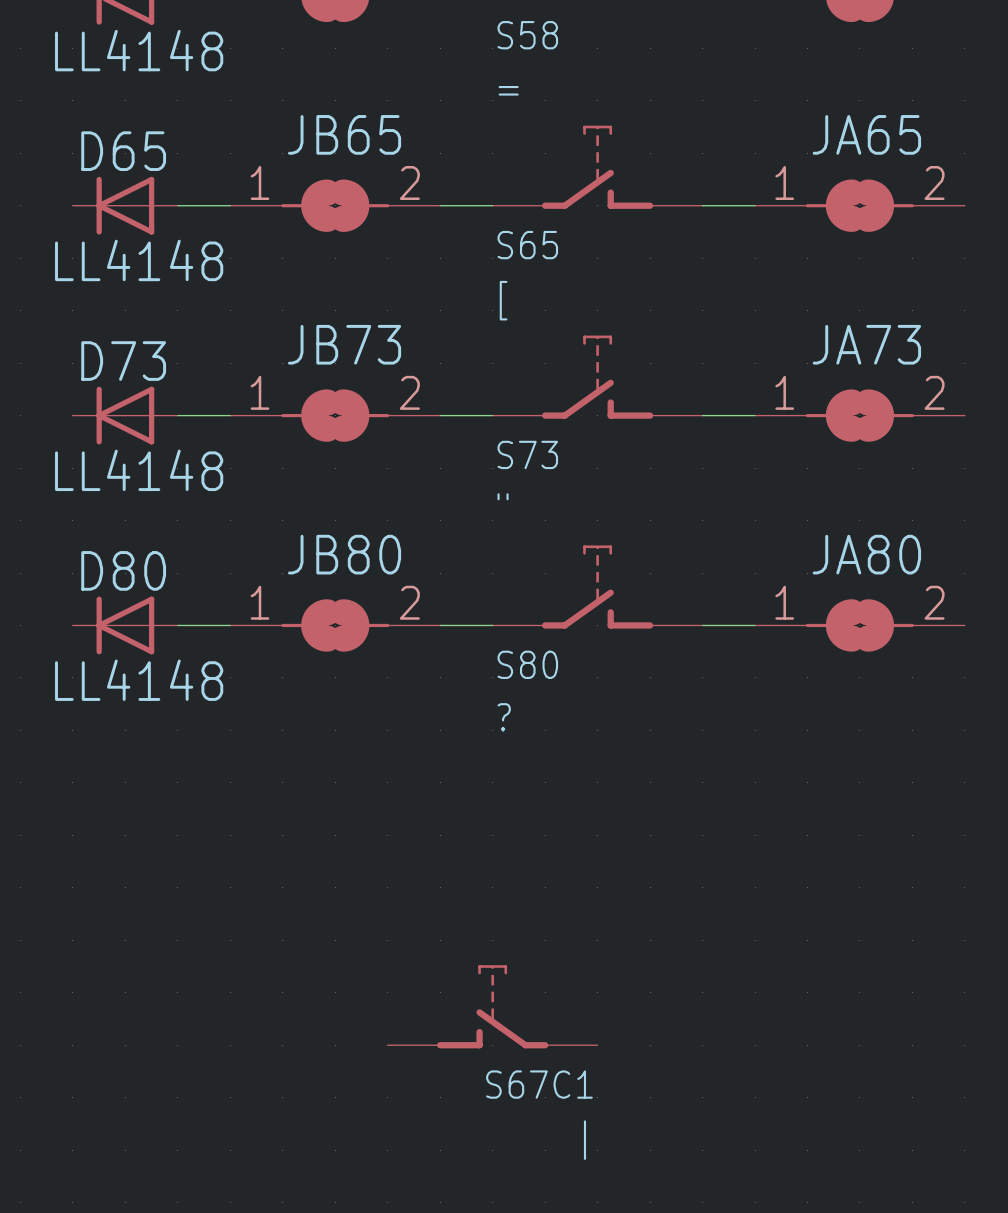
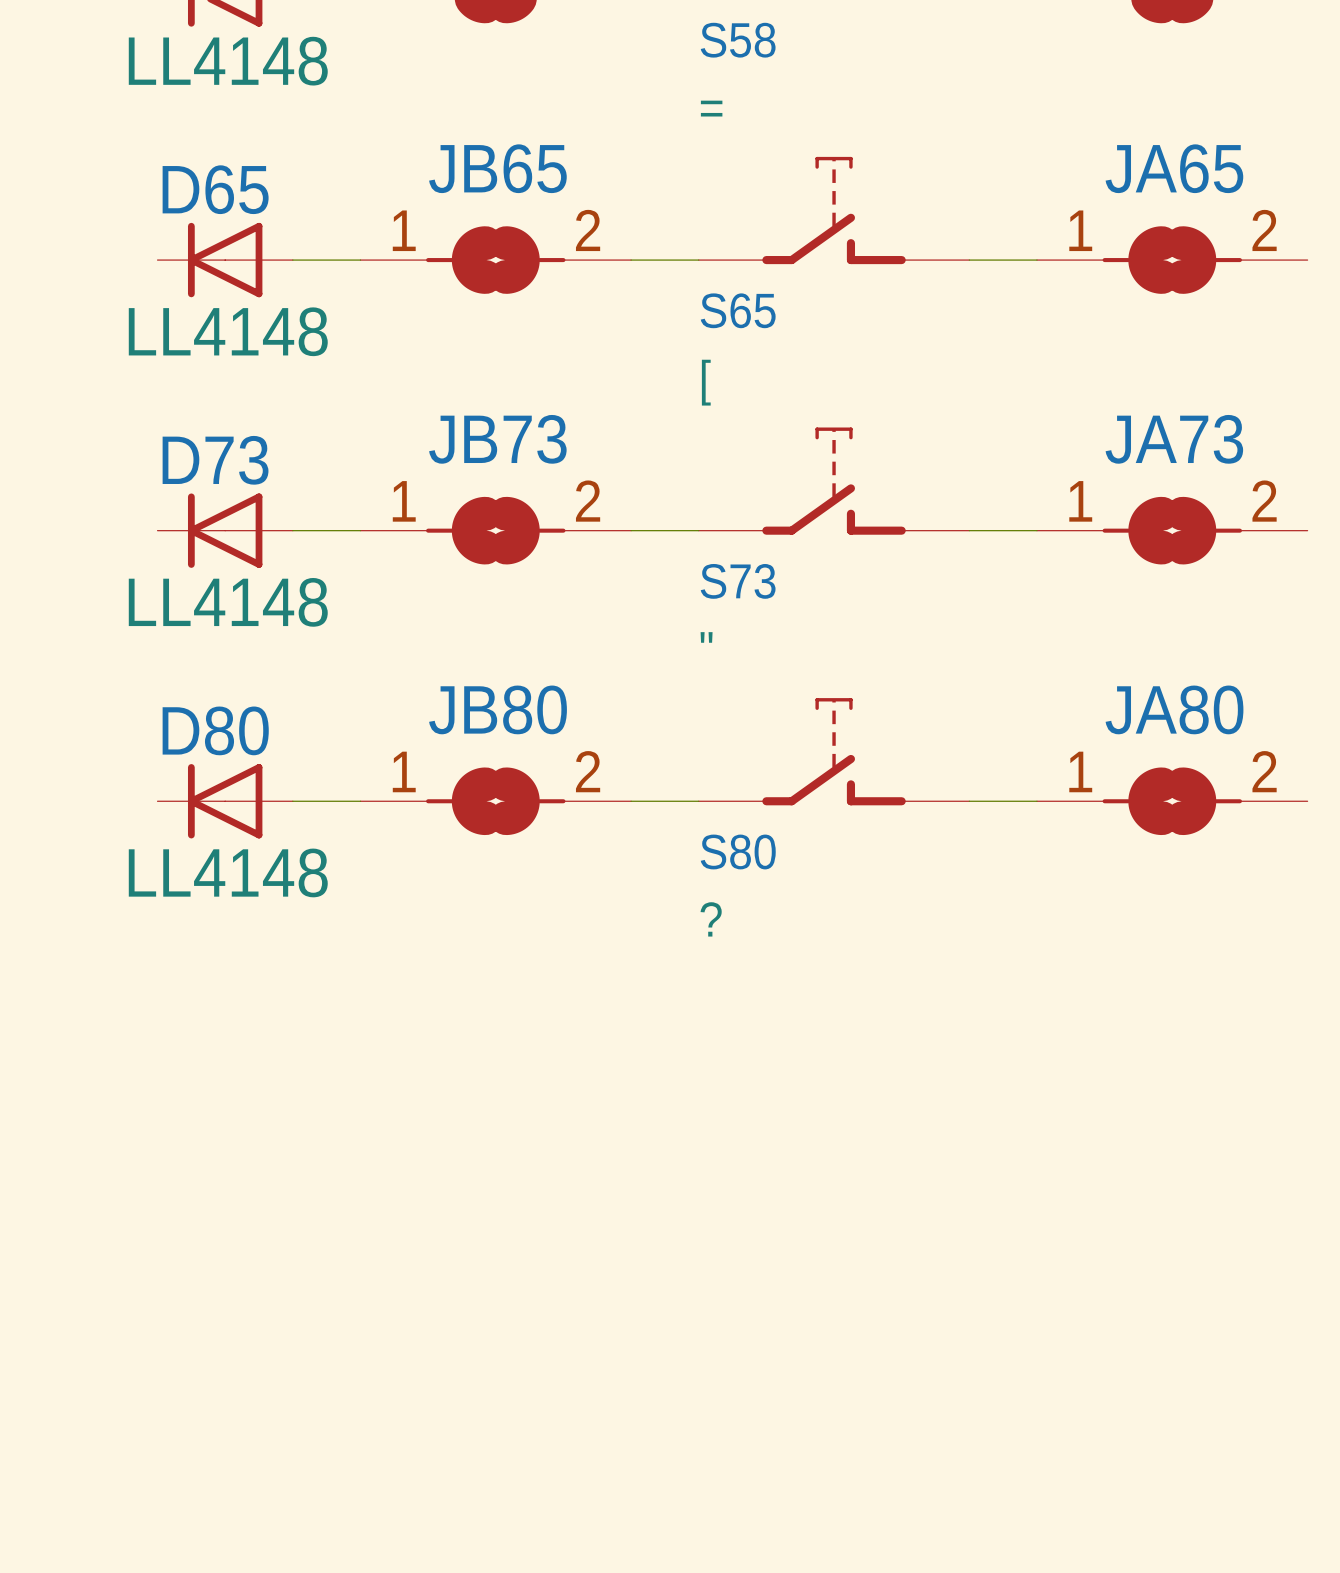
S67C1: | (492, 1006) -> none

